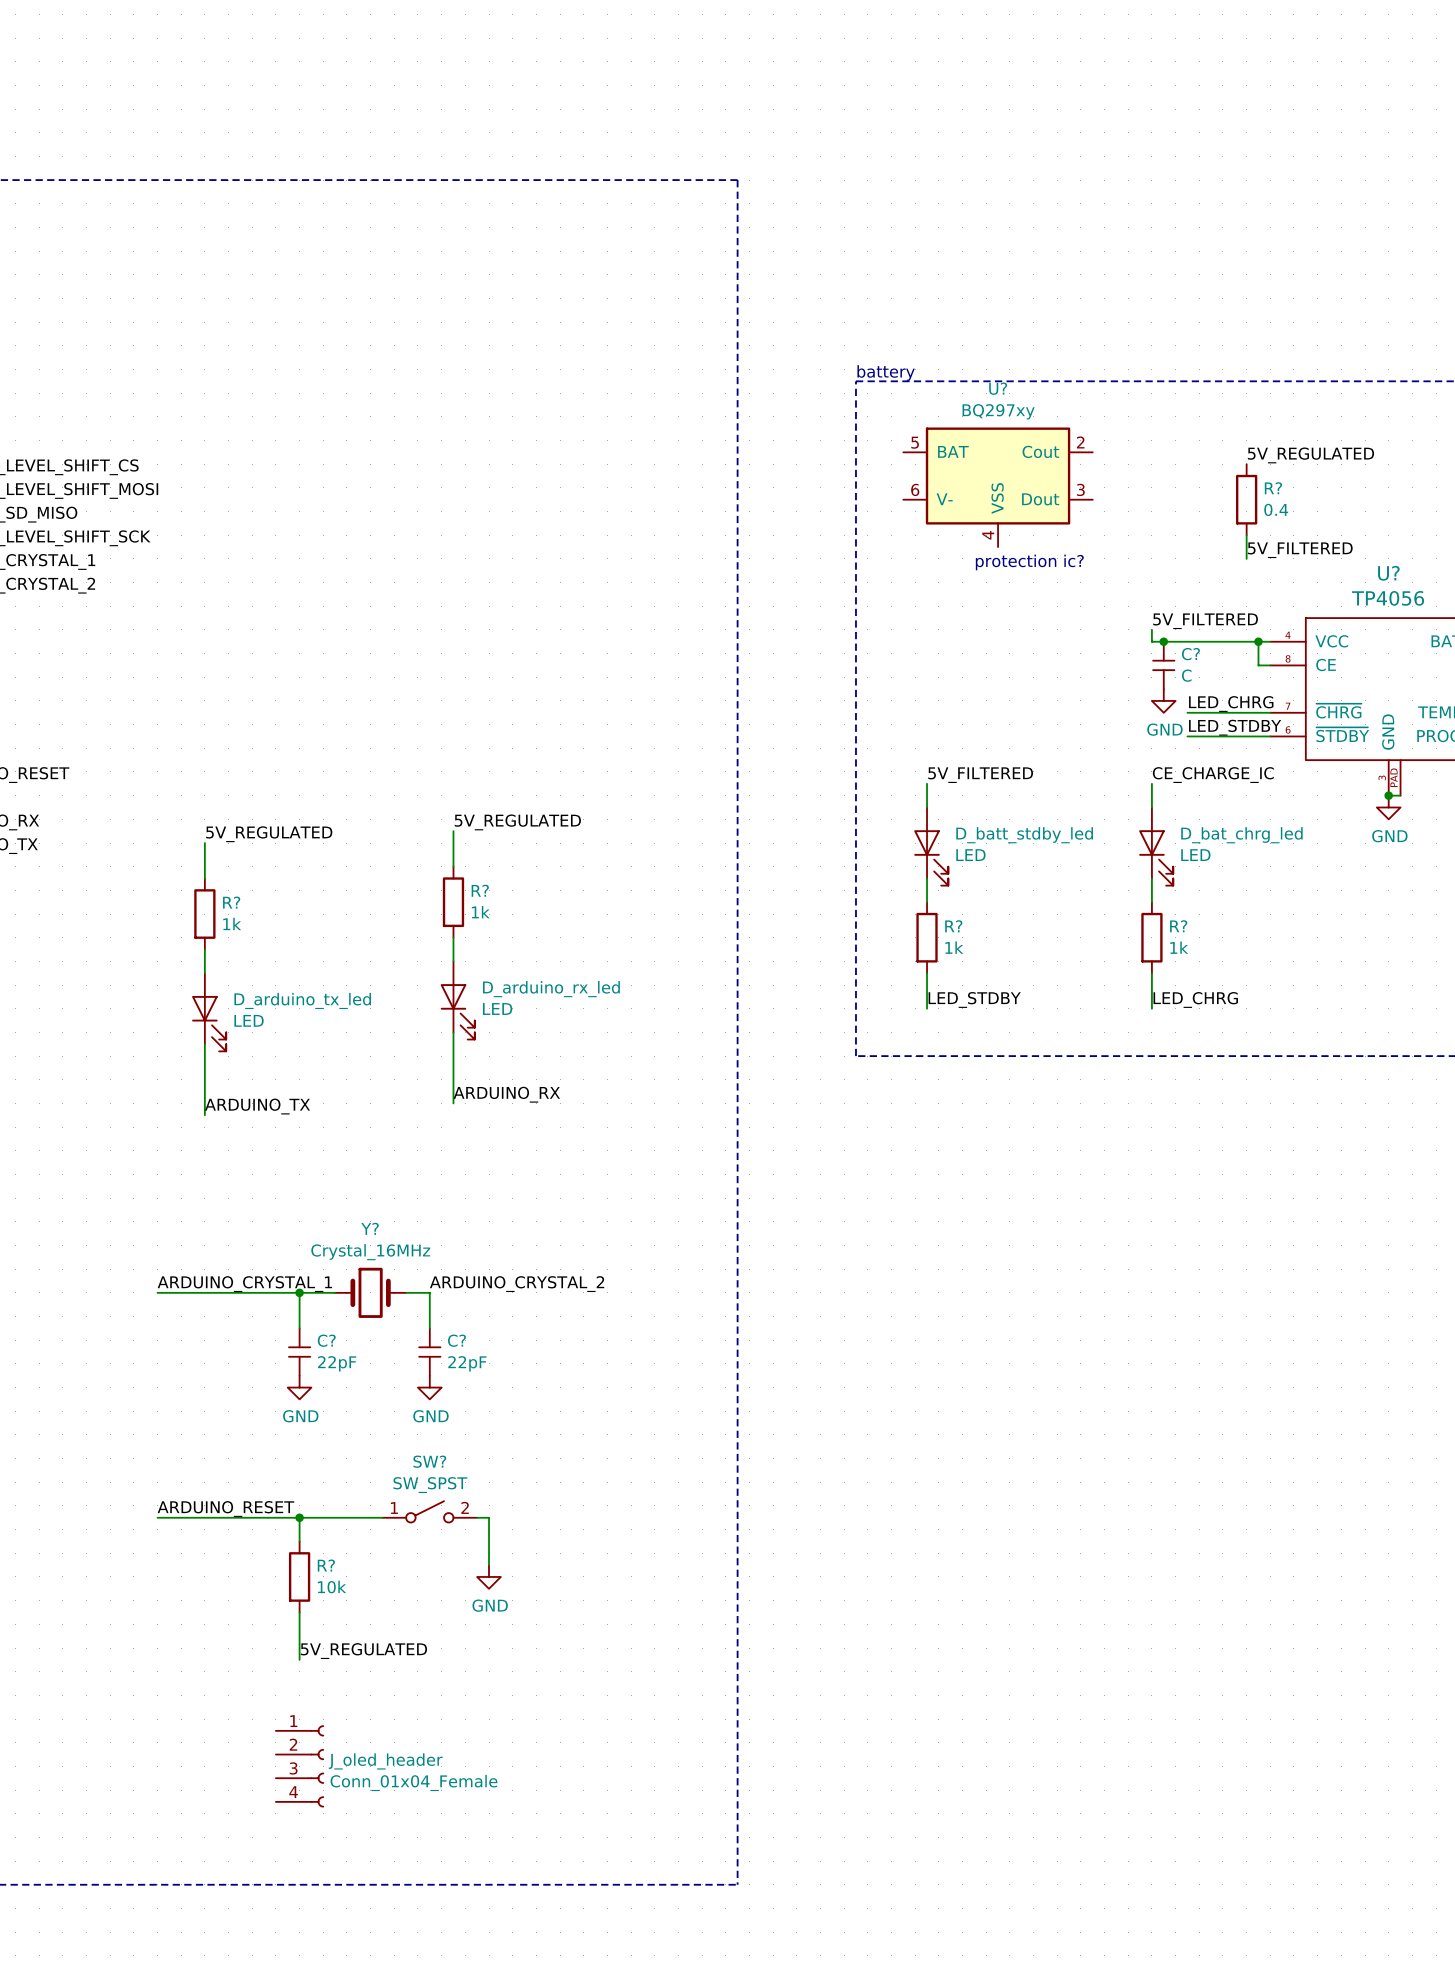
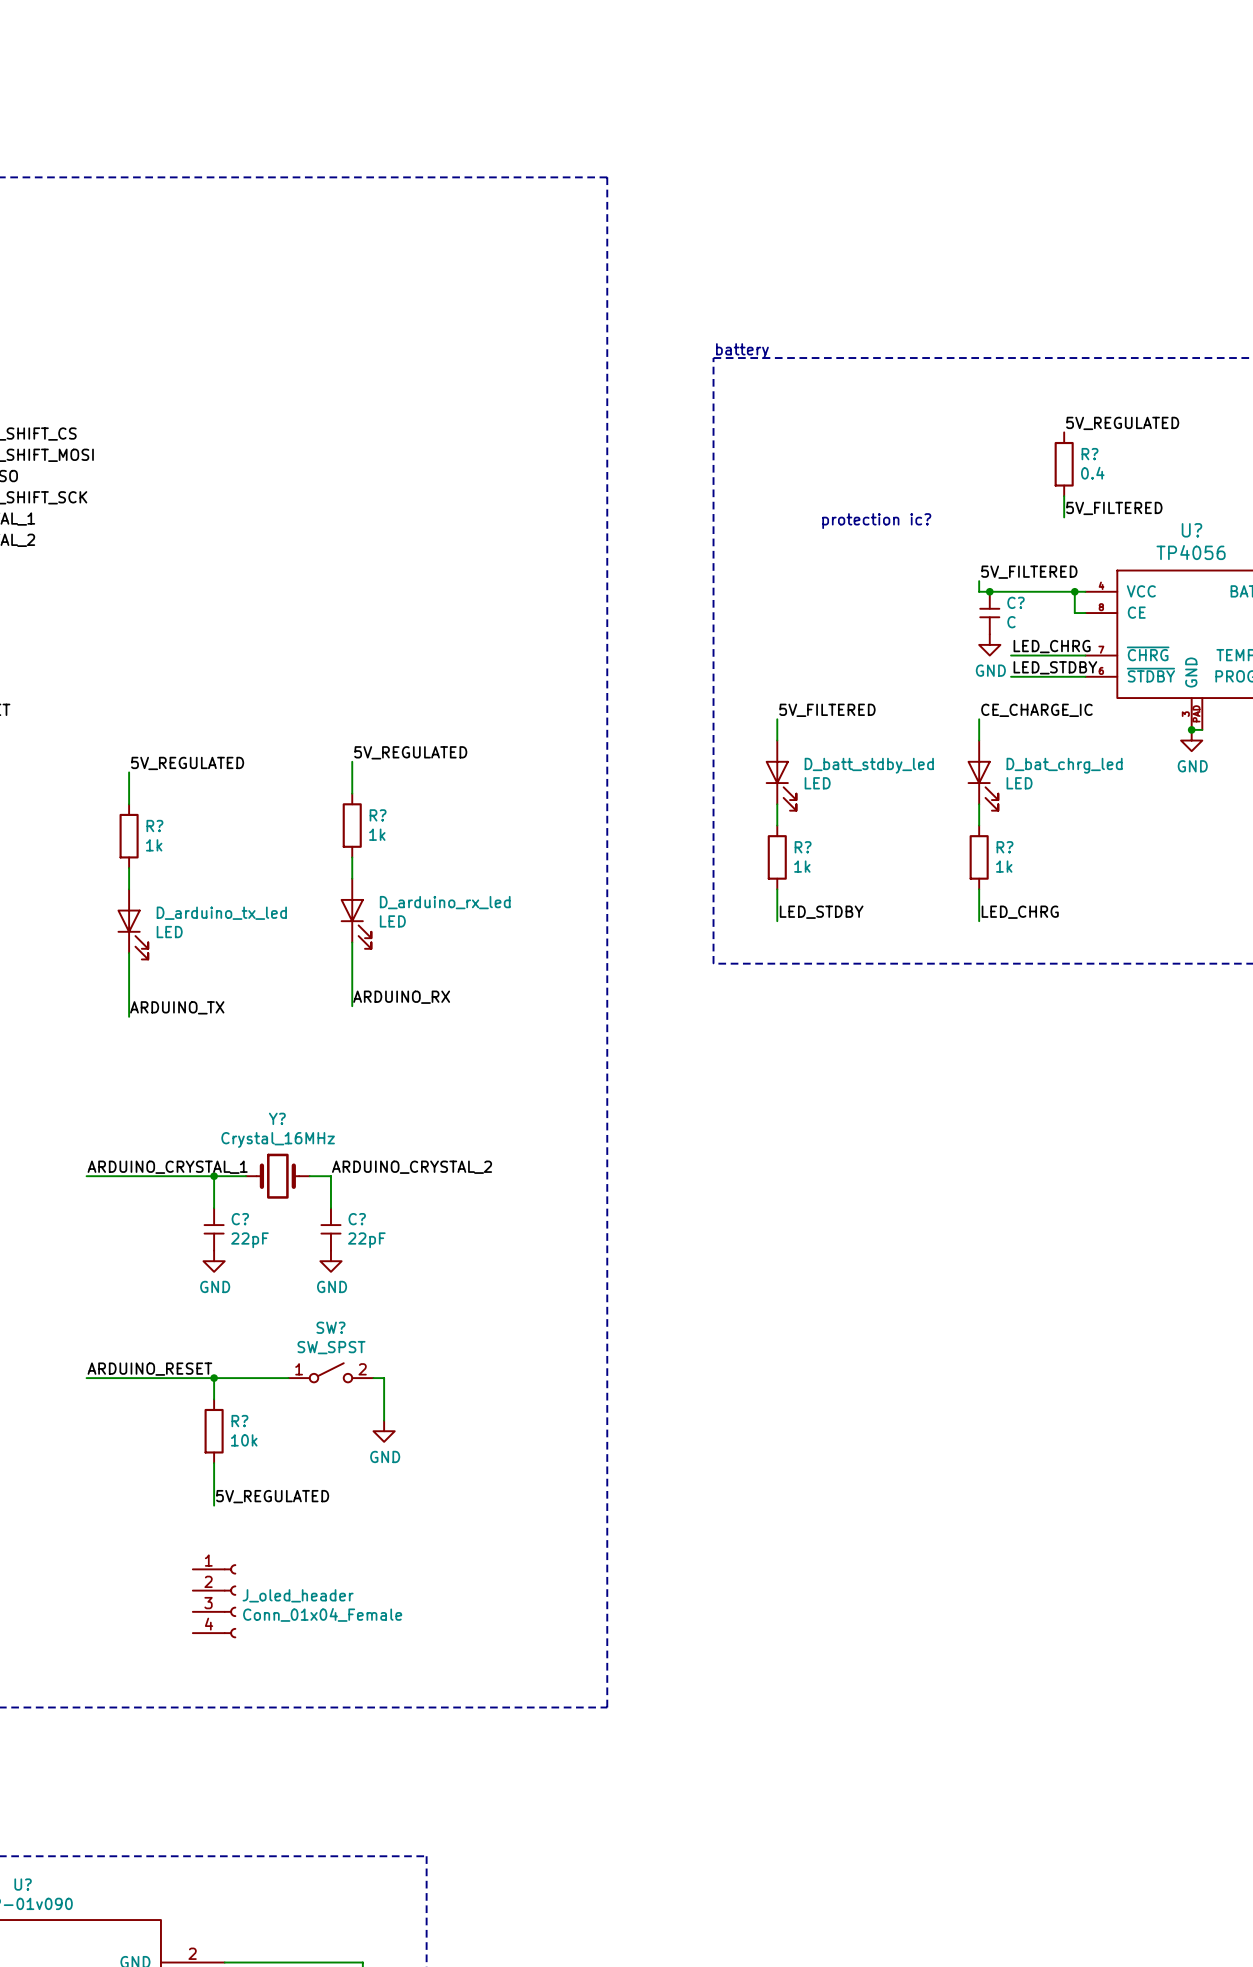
U?: BQ297xy (998, 487) -> none

